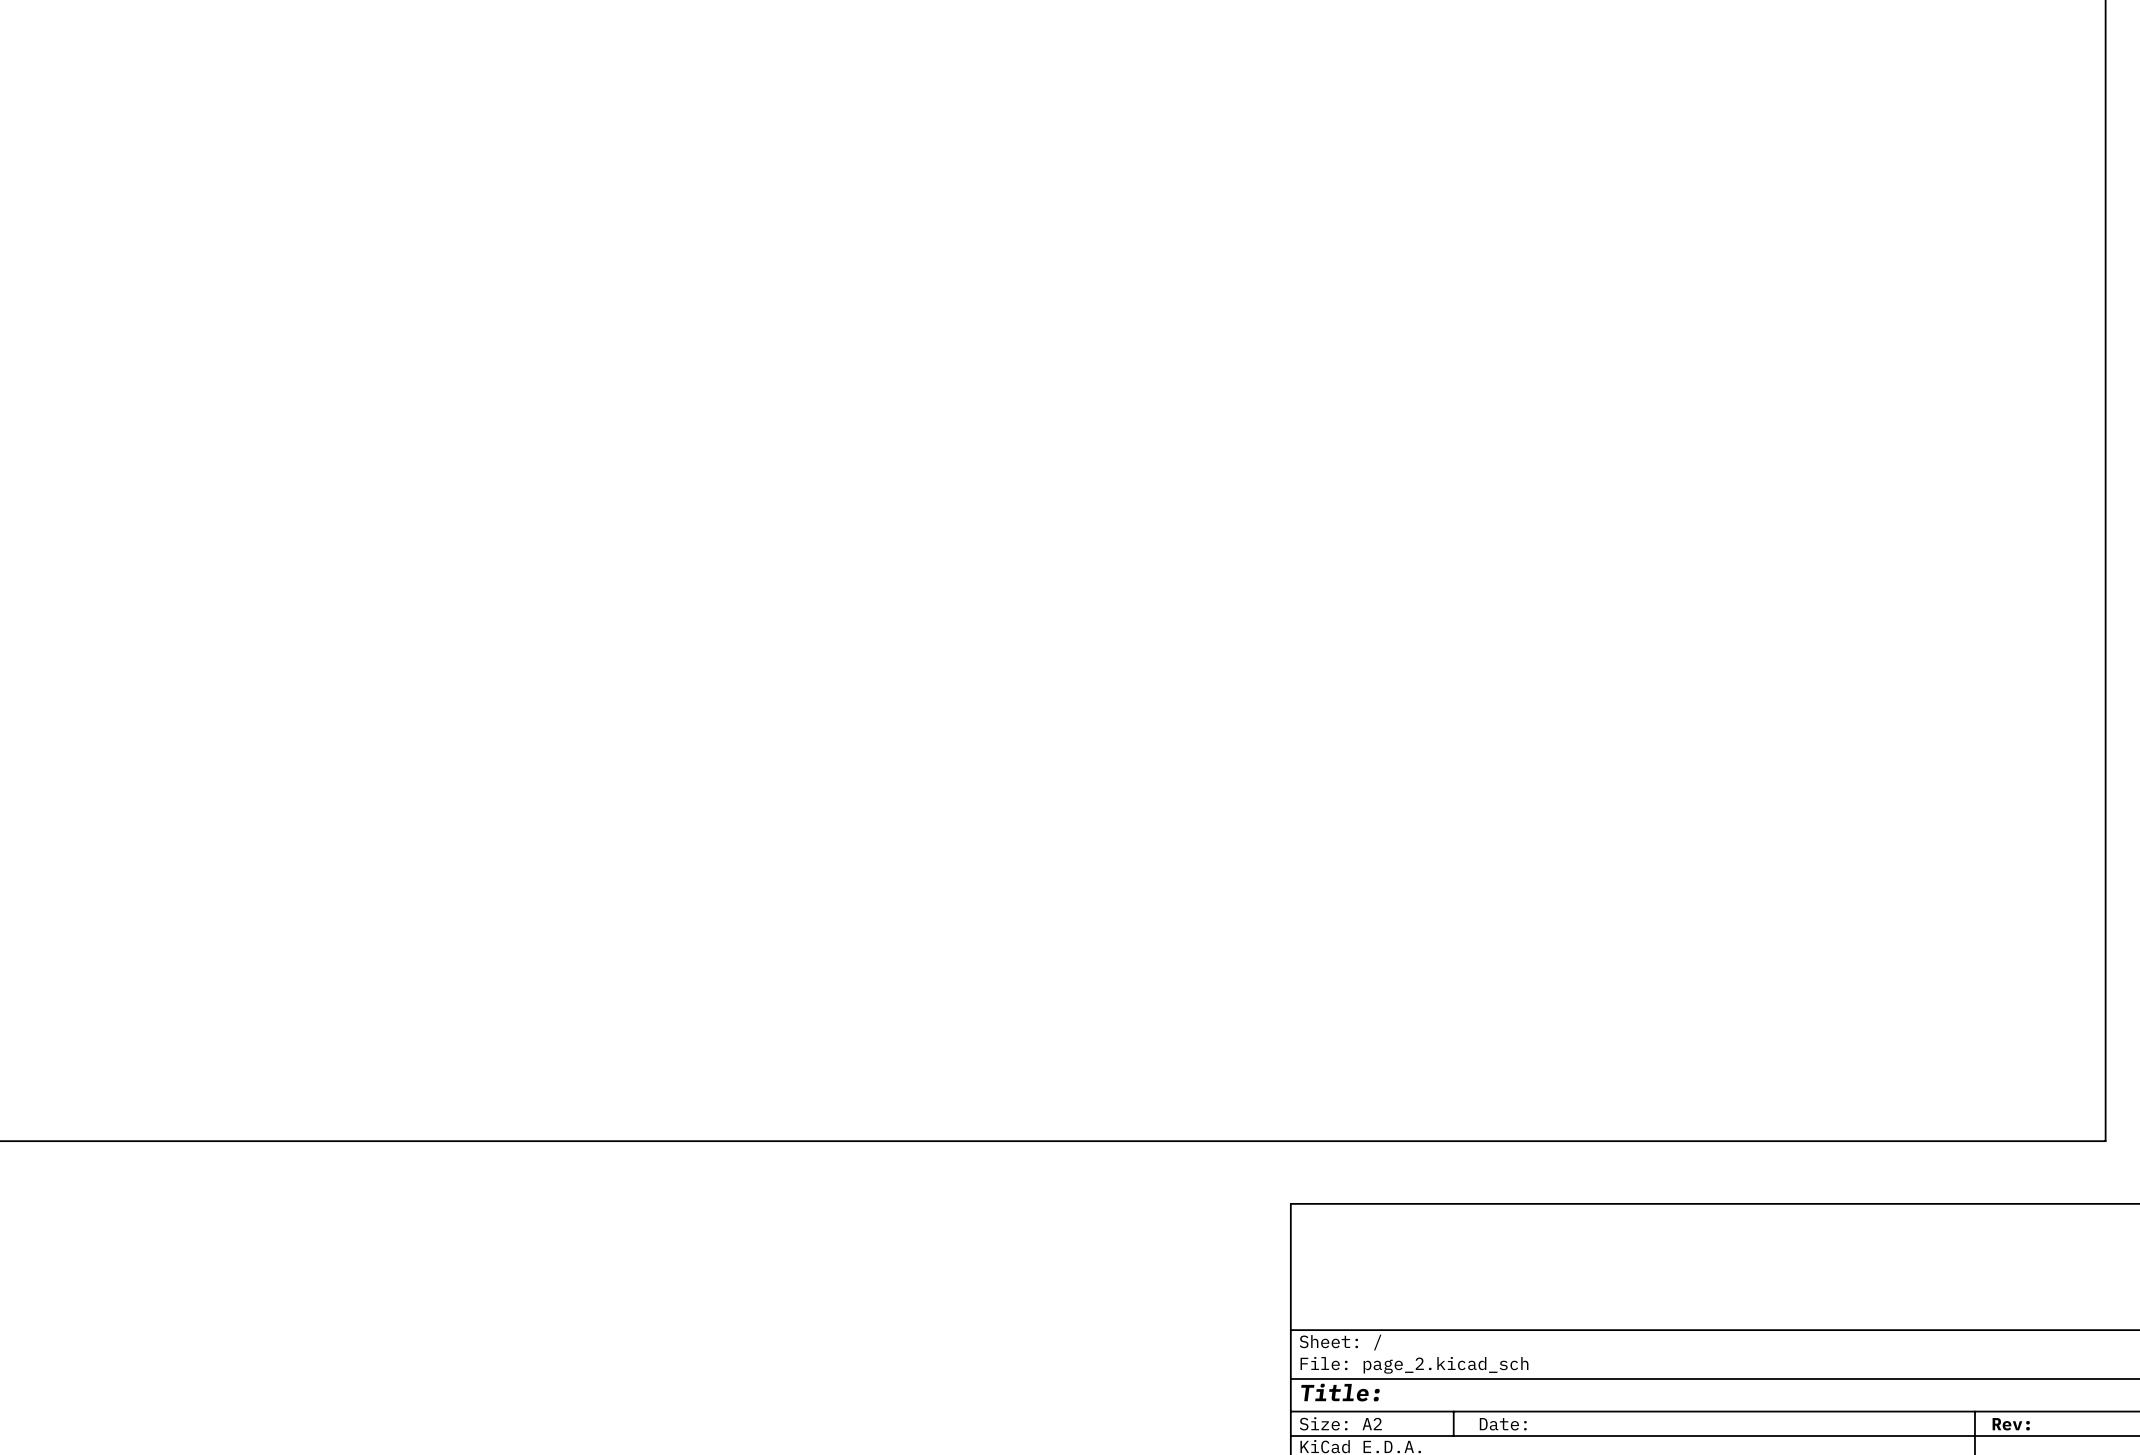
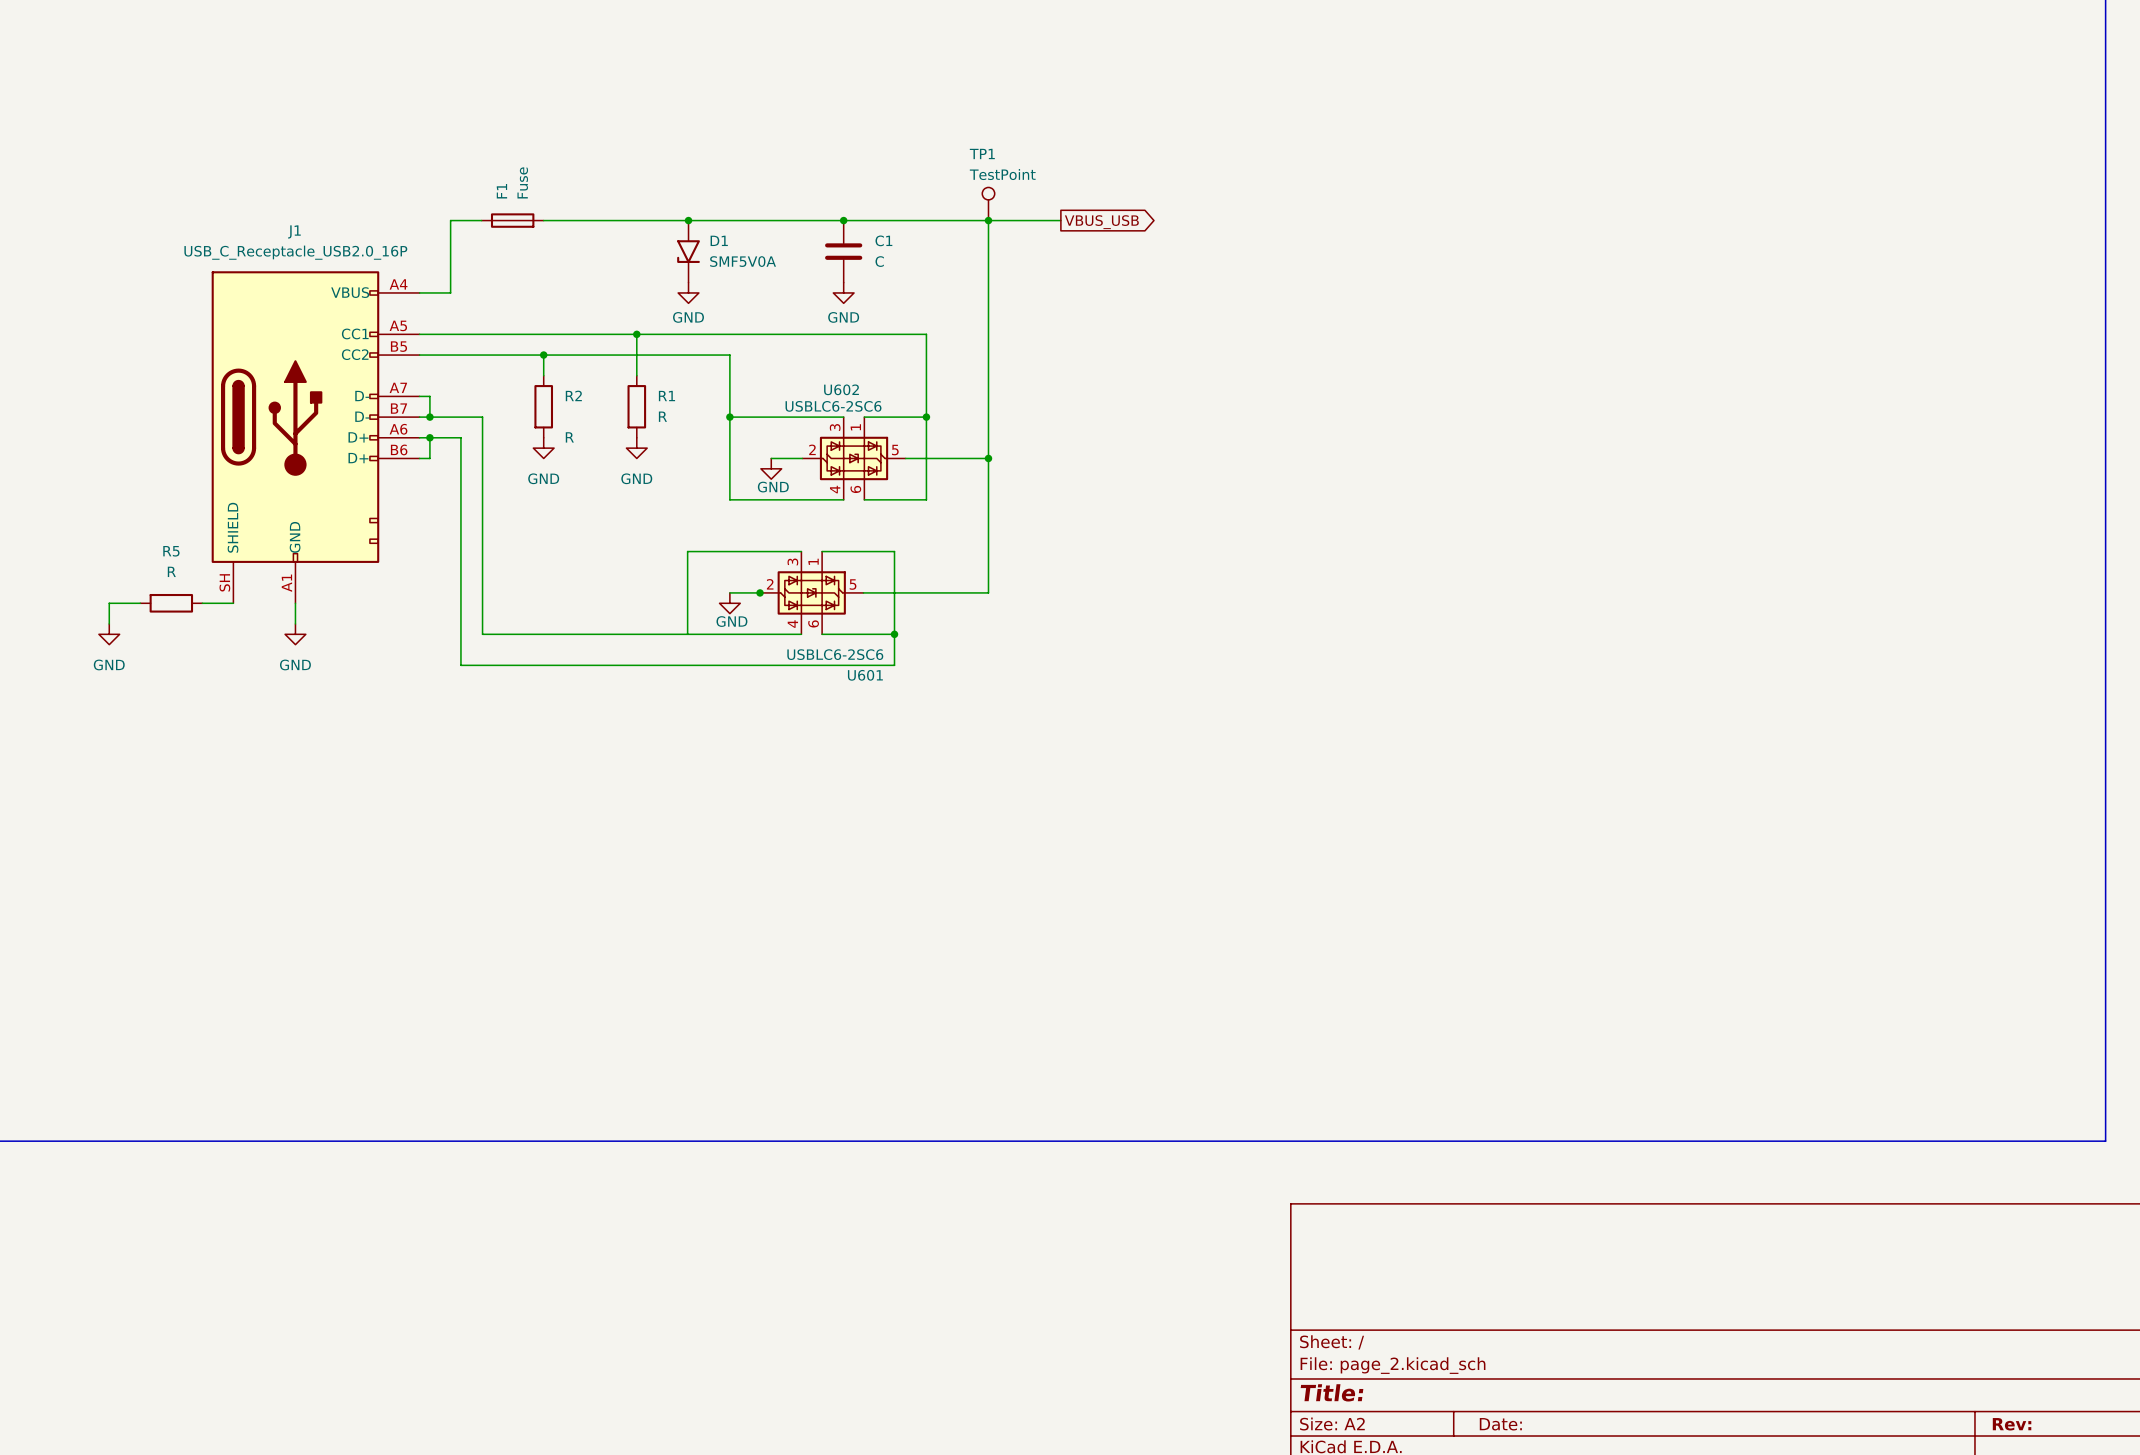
TP1: none -> TestPoint (988, 204)
wire: none -> (481, 220) (450, 220) (450, 292) (419, 292)
F1: none -> Fuse (512, 220)
wire: none -> (543, 220) (1060, 220)
junction: none -> (688, 220)
junction: none -> (843, 220)
wire: none -> (988, 220) (988, 592) (863, 592)
junction: none -> (988, 220)
global label: none -> VBUS_USB (1101, 222)
D1: none -> SMF5V0A (688, 251)
C1: none -> C (843, 251)
power symbol: none -> GND (688, 292)
power symbol: none -> GND (843, 292)
wire: none -> (419, 334) (926, 334) (926, 499) (864, 499)
wire: none -> (636, 334) (636, 375)
junction: none -> (636, 334)
wire: none -> (419, 355) (729, 355) (729, 499) (843, 499)
wire: none -> (543, 355) (543, 375)
junction: none -> (543, 355)
wire: none -> (419, 396) (429, 396) (429, 417)
R2: none -> R (543, 406)
R1: none -> R (636, 406)
wire: none -> (419, 417) (482, 417) (482, 634) (801, 634)
junction: none -> (429, 417)
wire: none -> (729, 417) (843, 417)
junction: none -> (729, 417)
wire: none -> (864, 417) (926, 417)
junction: none -> (926, 417)
J1: none -> USB_C_Receptacle_USB2.0_16P (315, 437)
wire: none -> (419, 437) (460, 437) (460, 665) (894, 665) (894, 551) (822, 551)
wire: none -> (429, 437) (429, 458) (419, 458)
junction: none -> (429, 437)
power symbol: none -> GND (543, 448)
power symbol: none -> GND (636, 448)
wire: none -> (771, 458) (802, 458)
U602: none -> USBLC6-2SC6 (854, 458)
wire: none -> (905, 458) (988, 458)
junction: none -> (988, 458)
power symbol: none -> GND (771, 468)
wire: none -> (801, 551) (687, 551) (687, 634)
wire: none -> (729, 592) (760, 592)
junction: none -> (760, 592)
U601: none -> USBLC6-2SC6 (811, 592)
wire: none -> (140, 603) (109, 603) (109, 623)
R5: none -> R (171, 603)
wire: none -> (202, 603) (233, 603)
wire: none -> (295, 603) (295, 623)
power symbol: none -> GND (729, 603)
power symbol: none -> GND (109, 634)
power symbol: none -> GND (295, 634)
wire: none -> (822, 634) (894, 634)
junction: none -> (894, 634)

